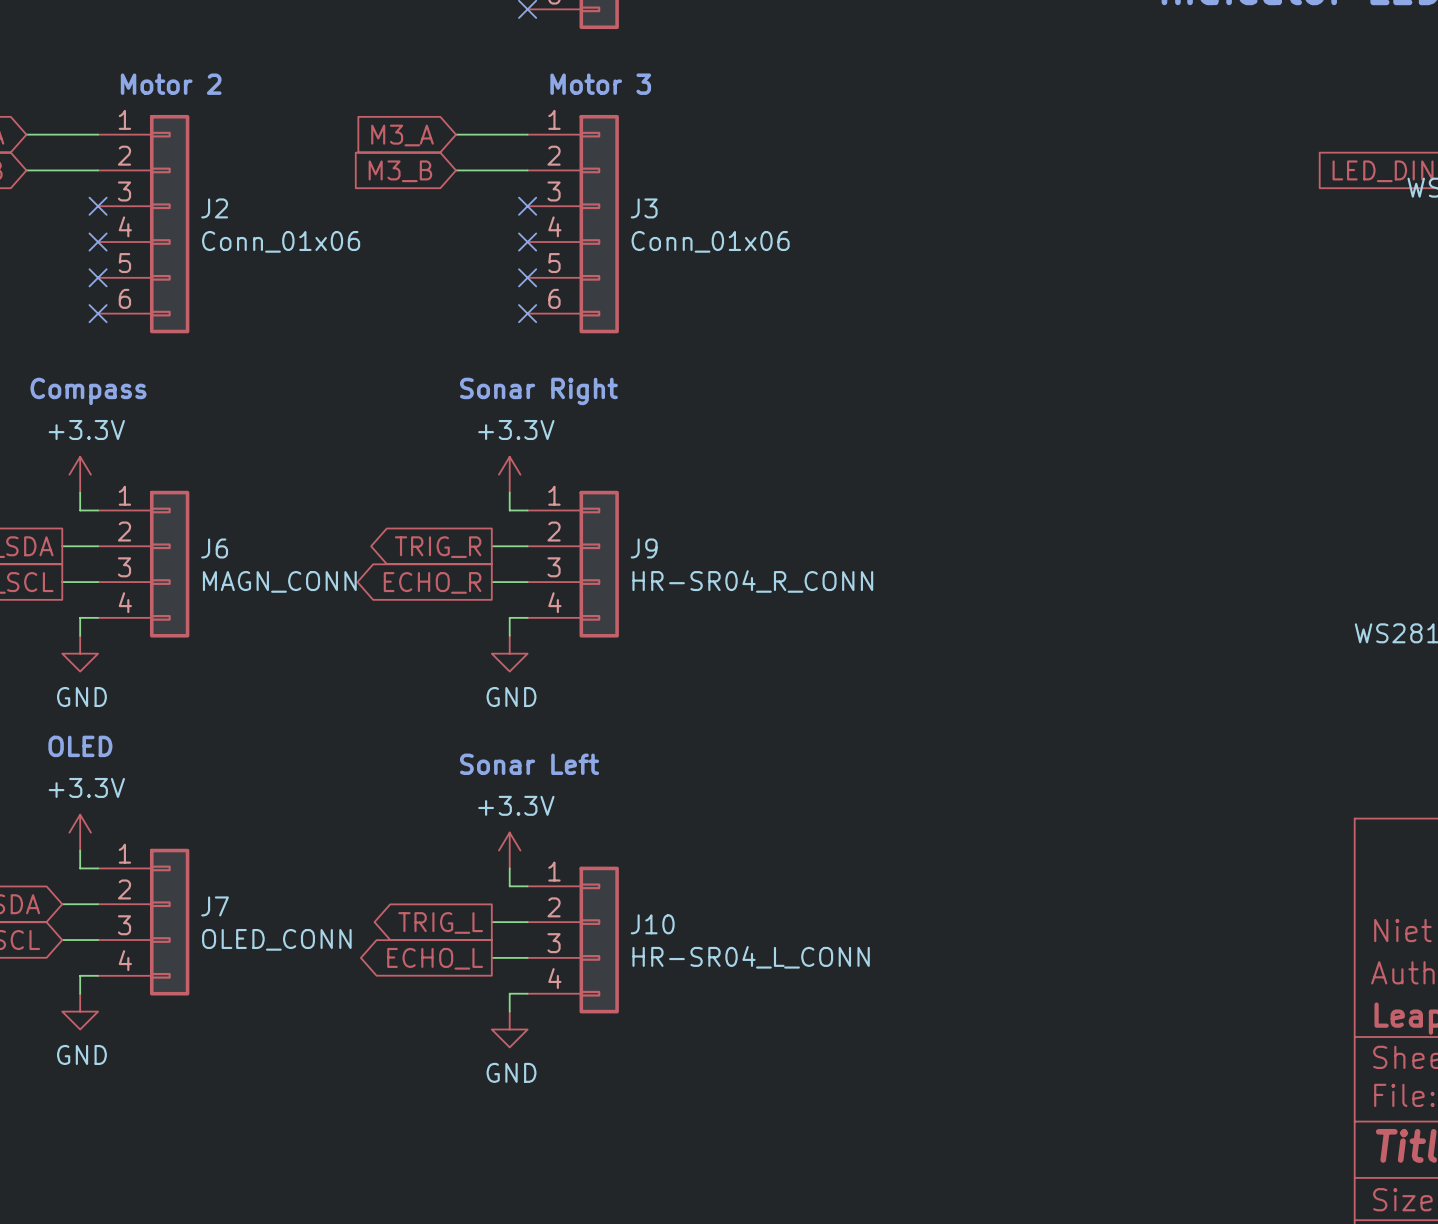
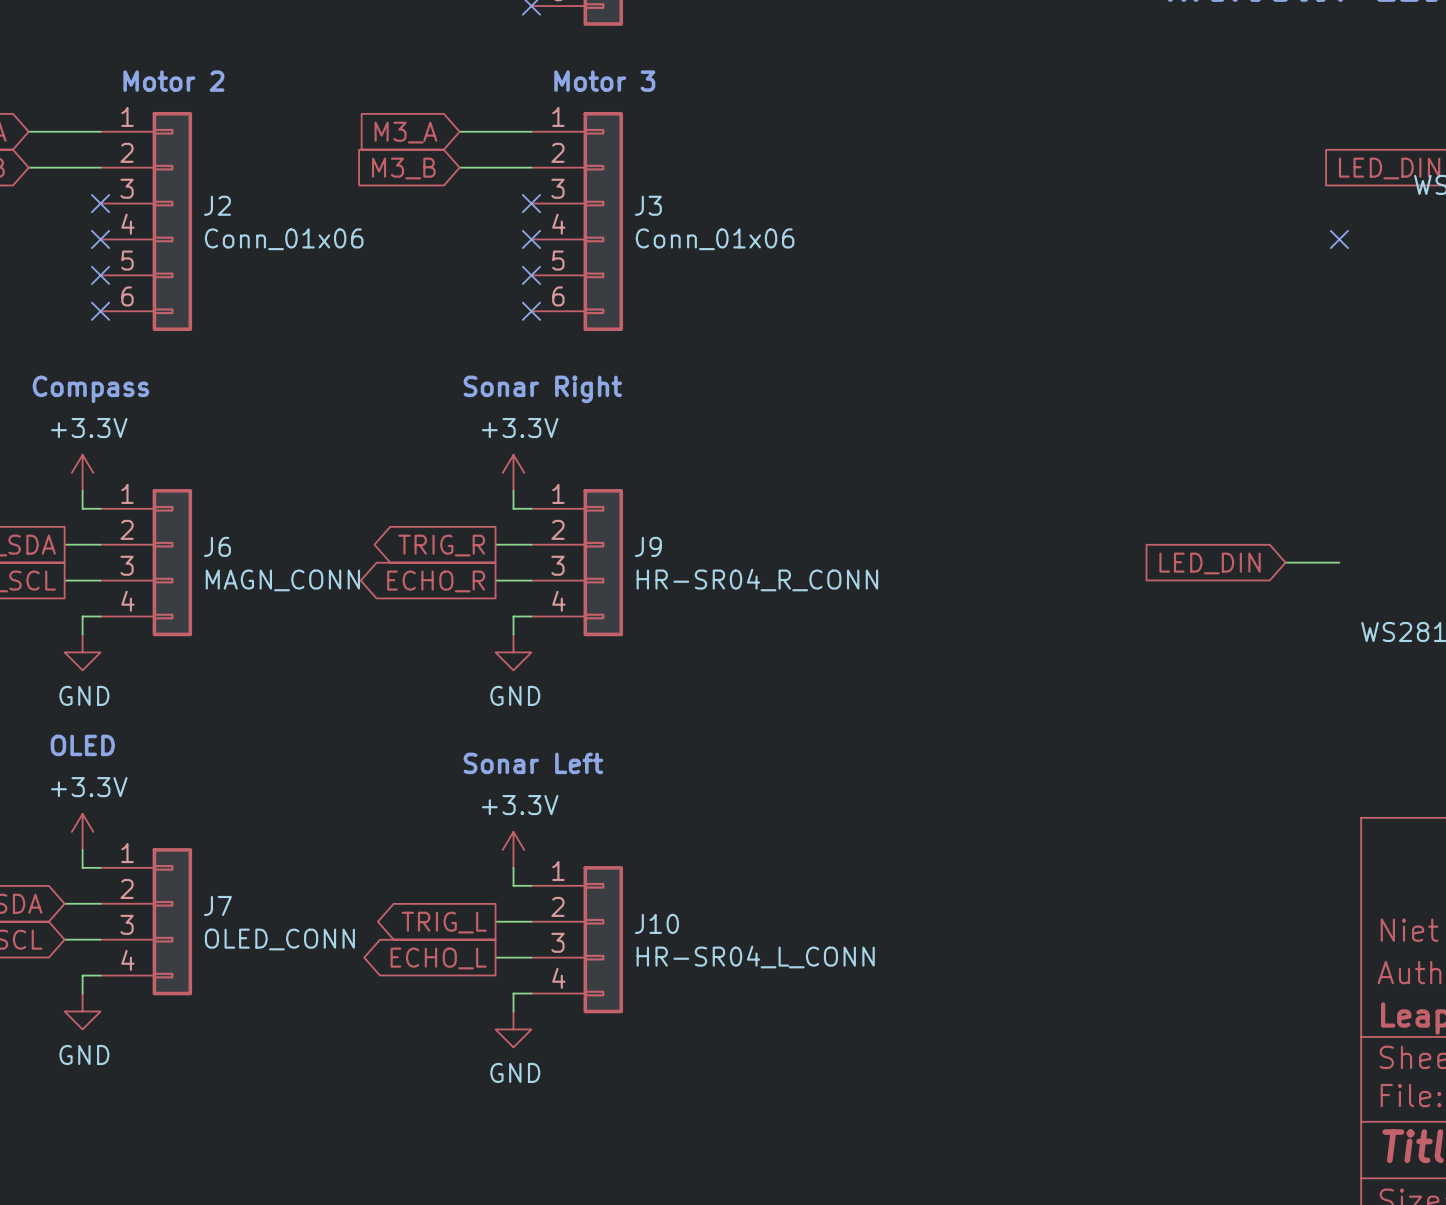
no-connect mark: none -> (1339, 239)
wire: none -> (1285, 562) (1339, 562)
global label: none -> LED_DIN (1210, 563)

